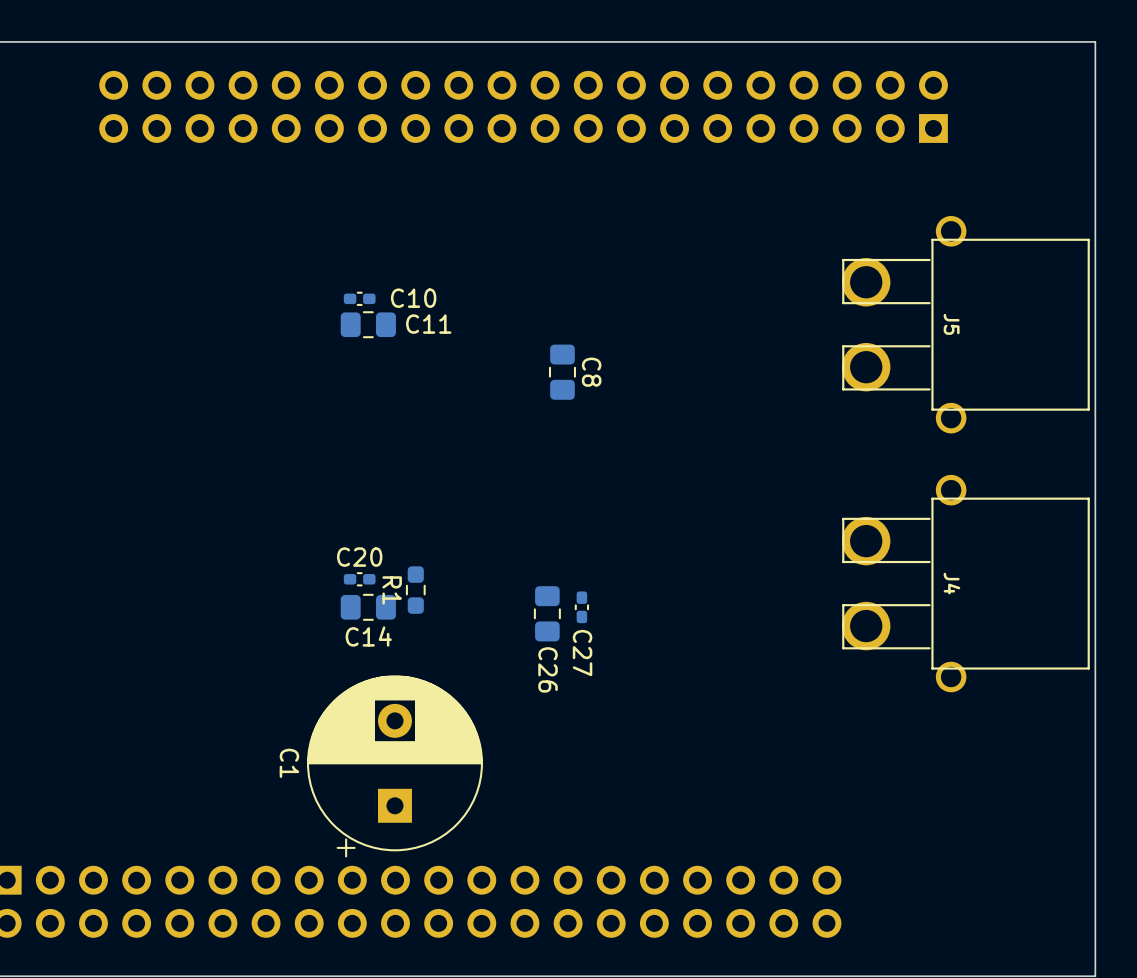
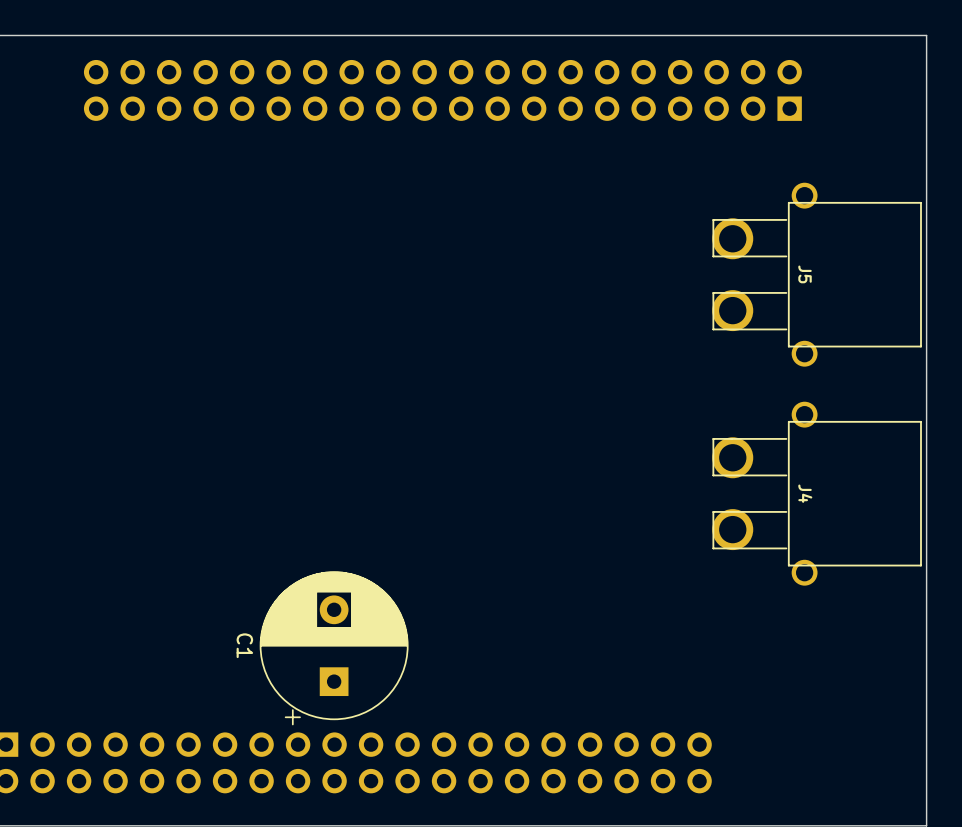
C10: (359, 298) -> none
C11: (368, 324) -> none
C8: (562, 372) -> none
C20: (359, 579) -> none
R1: (415, 590) -> none
C14: (368, 607) -> none
C27: (581, 607) -> none
C26: (547, 613) -> none

